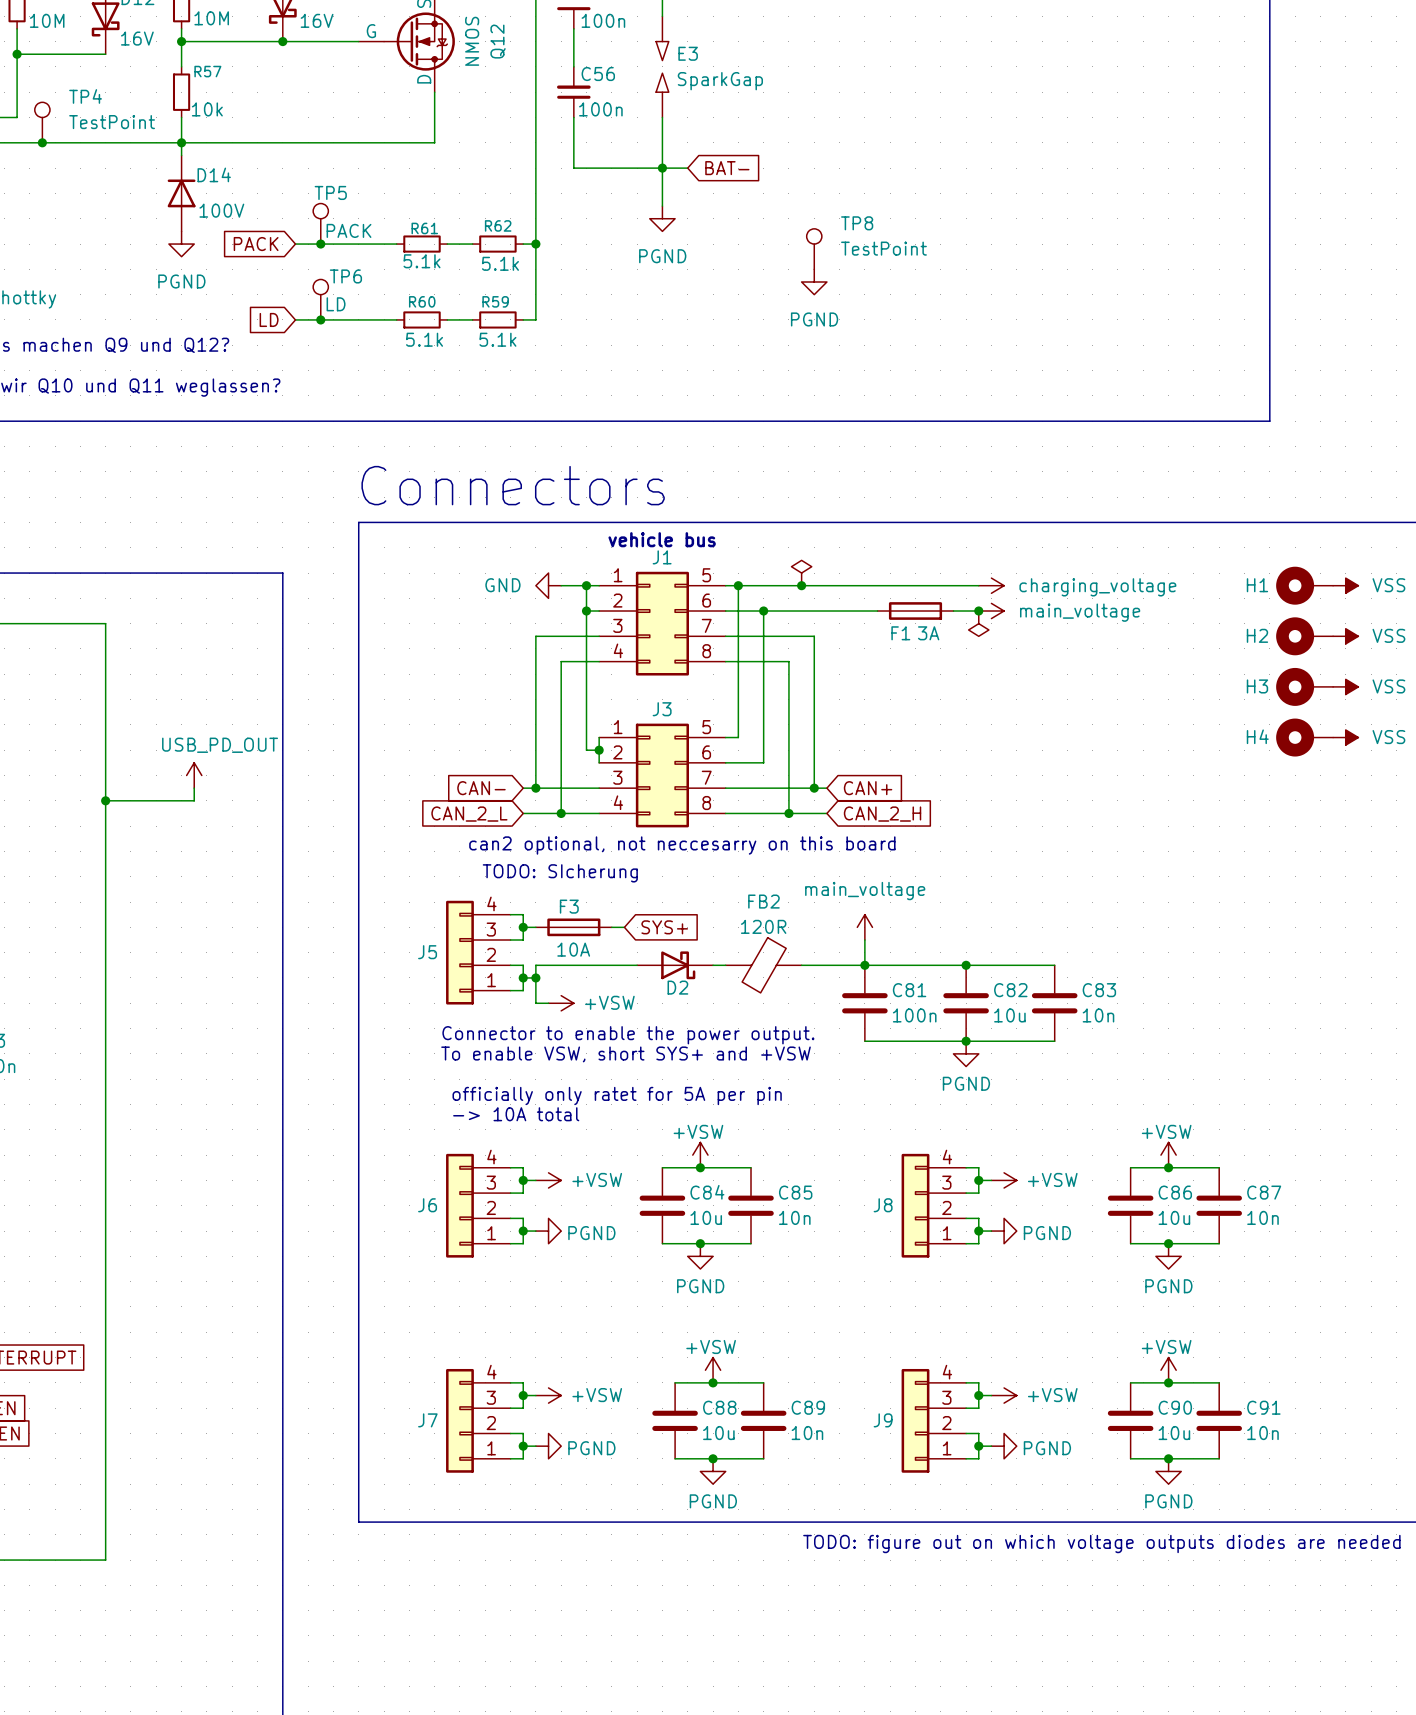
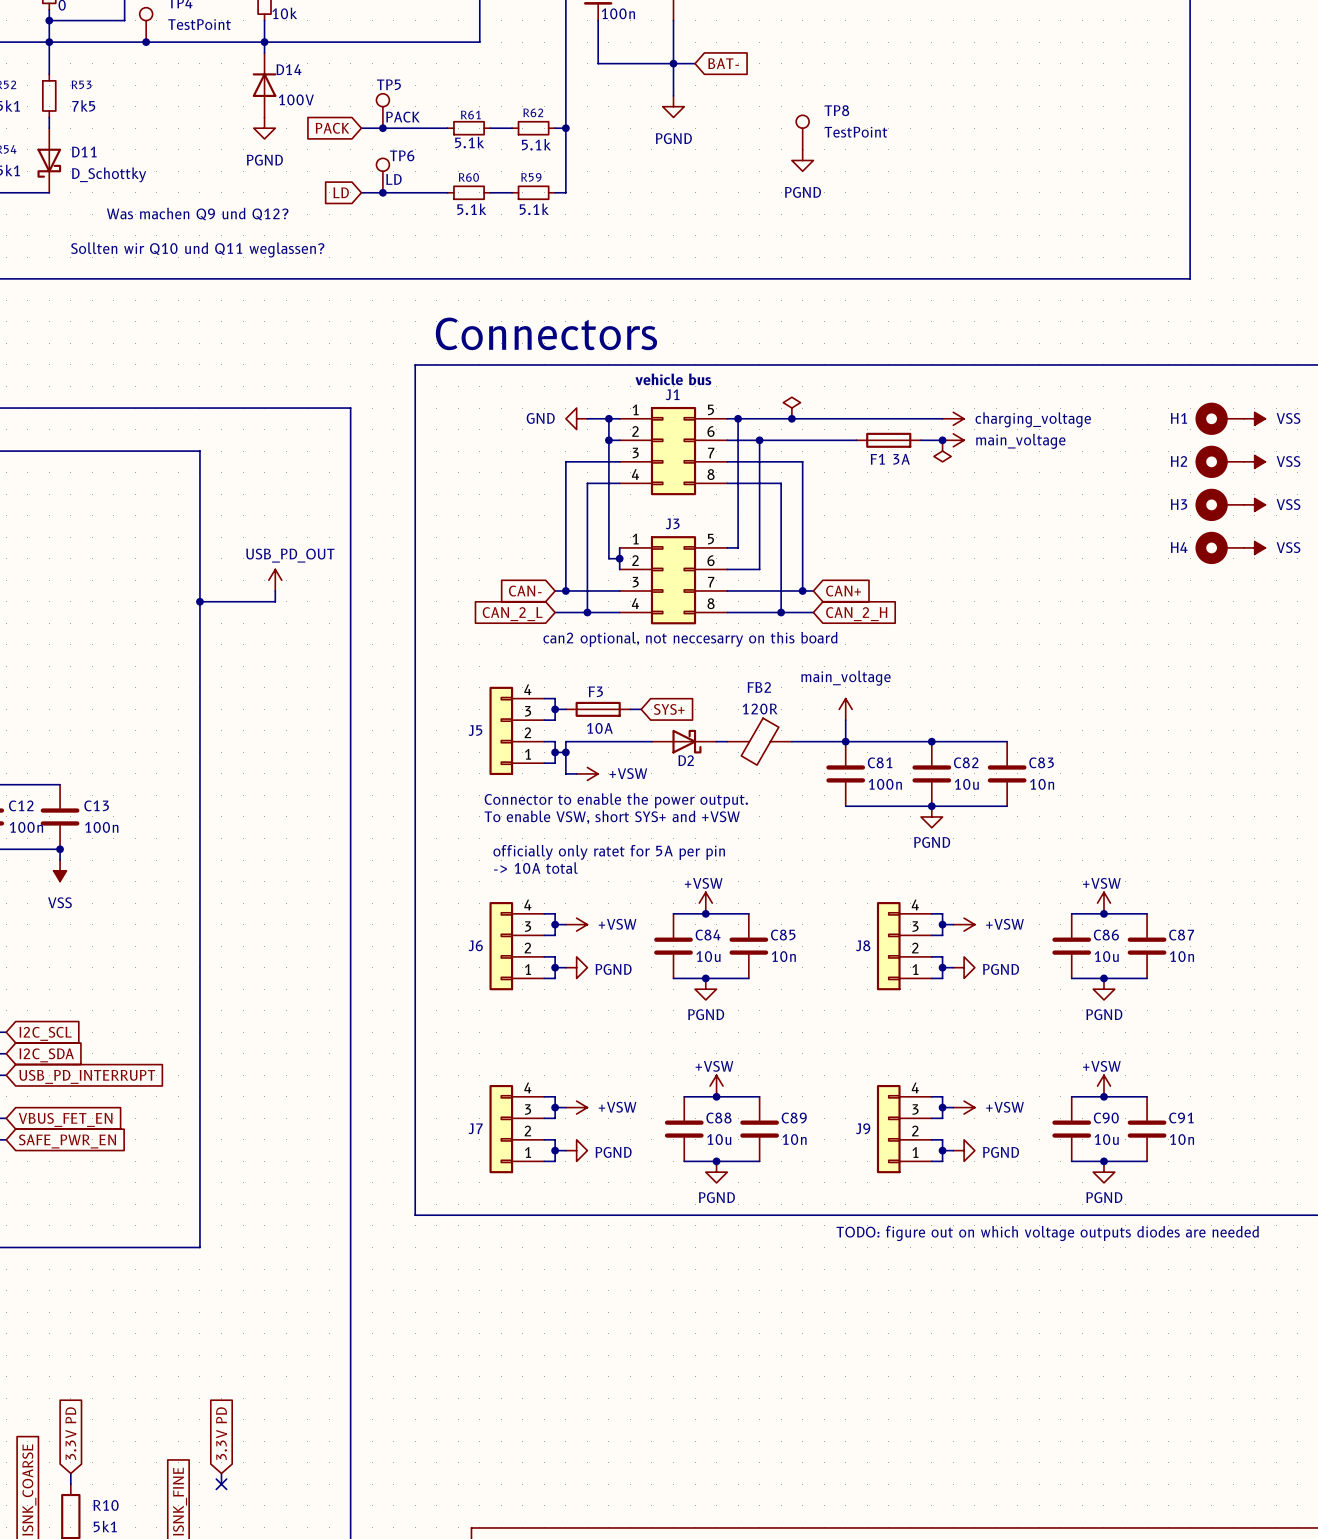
text: TODO: SIcherung (560, 873) -> none

